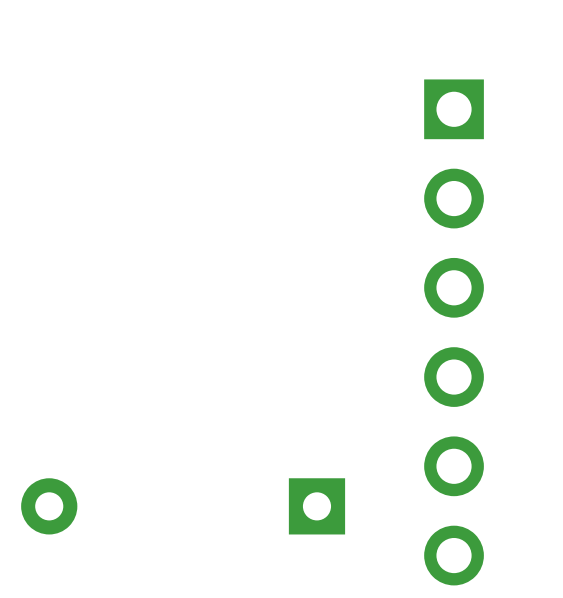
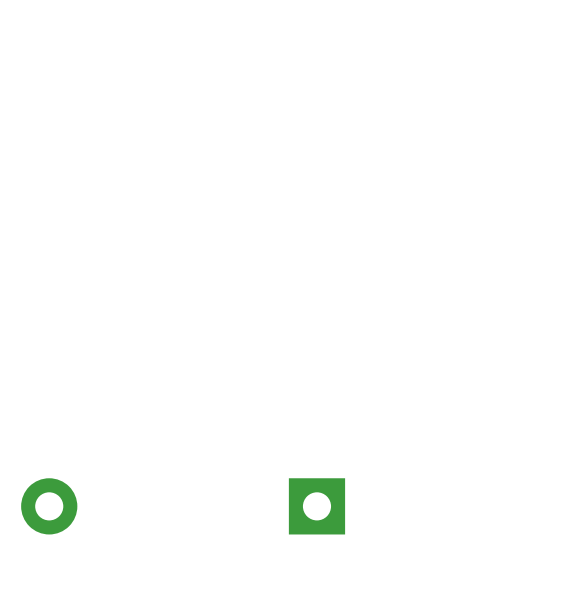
part: (454, 332) -> none

